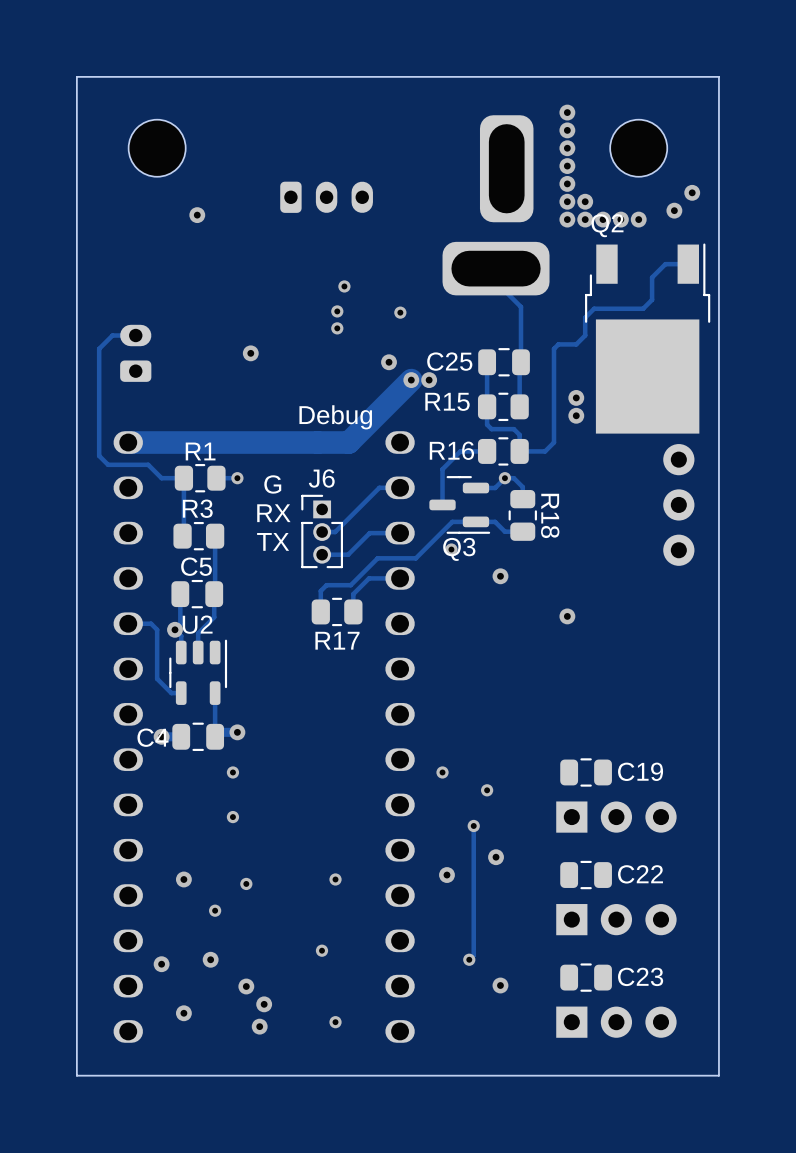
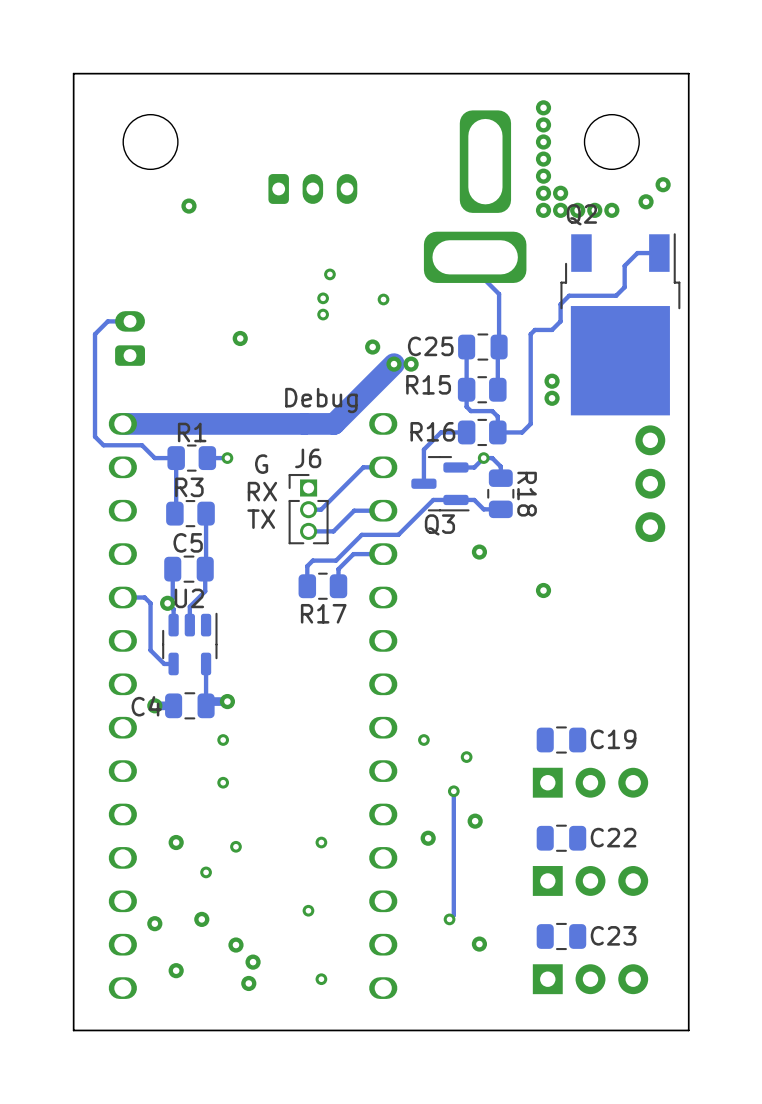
via: (451, 549) -> none

